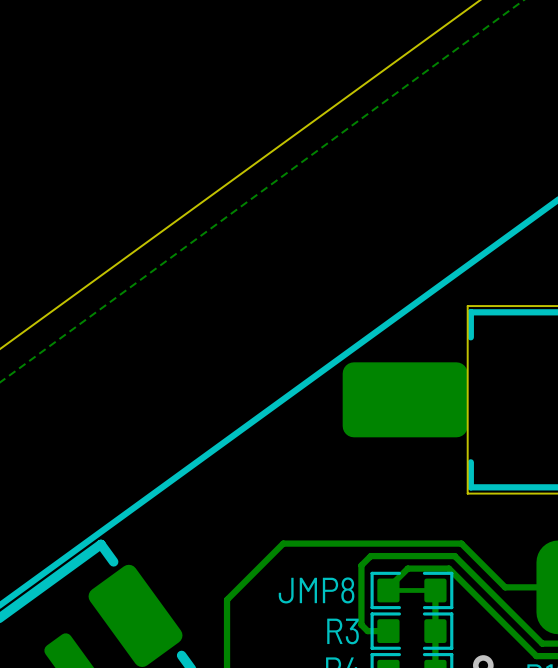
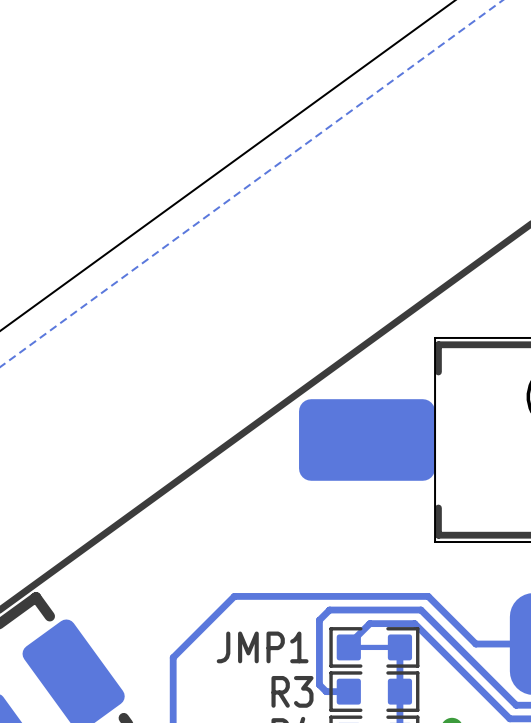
JMP8 name: JMP8 (316, 590) -> JMP1 (262, 647)

